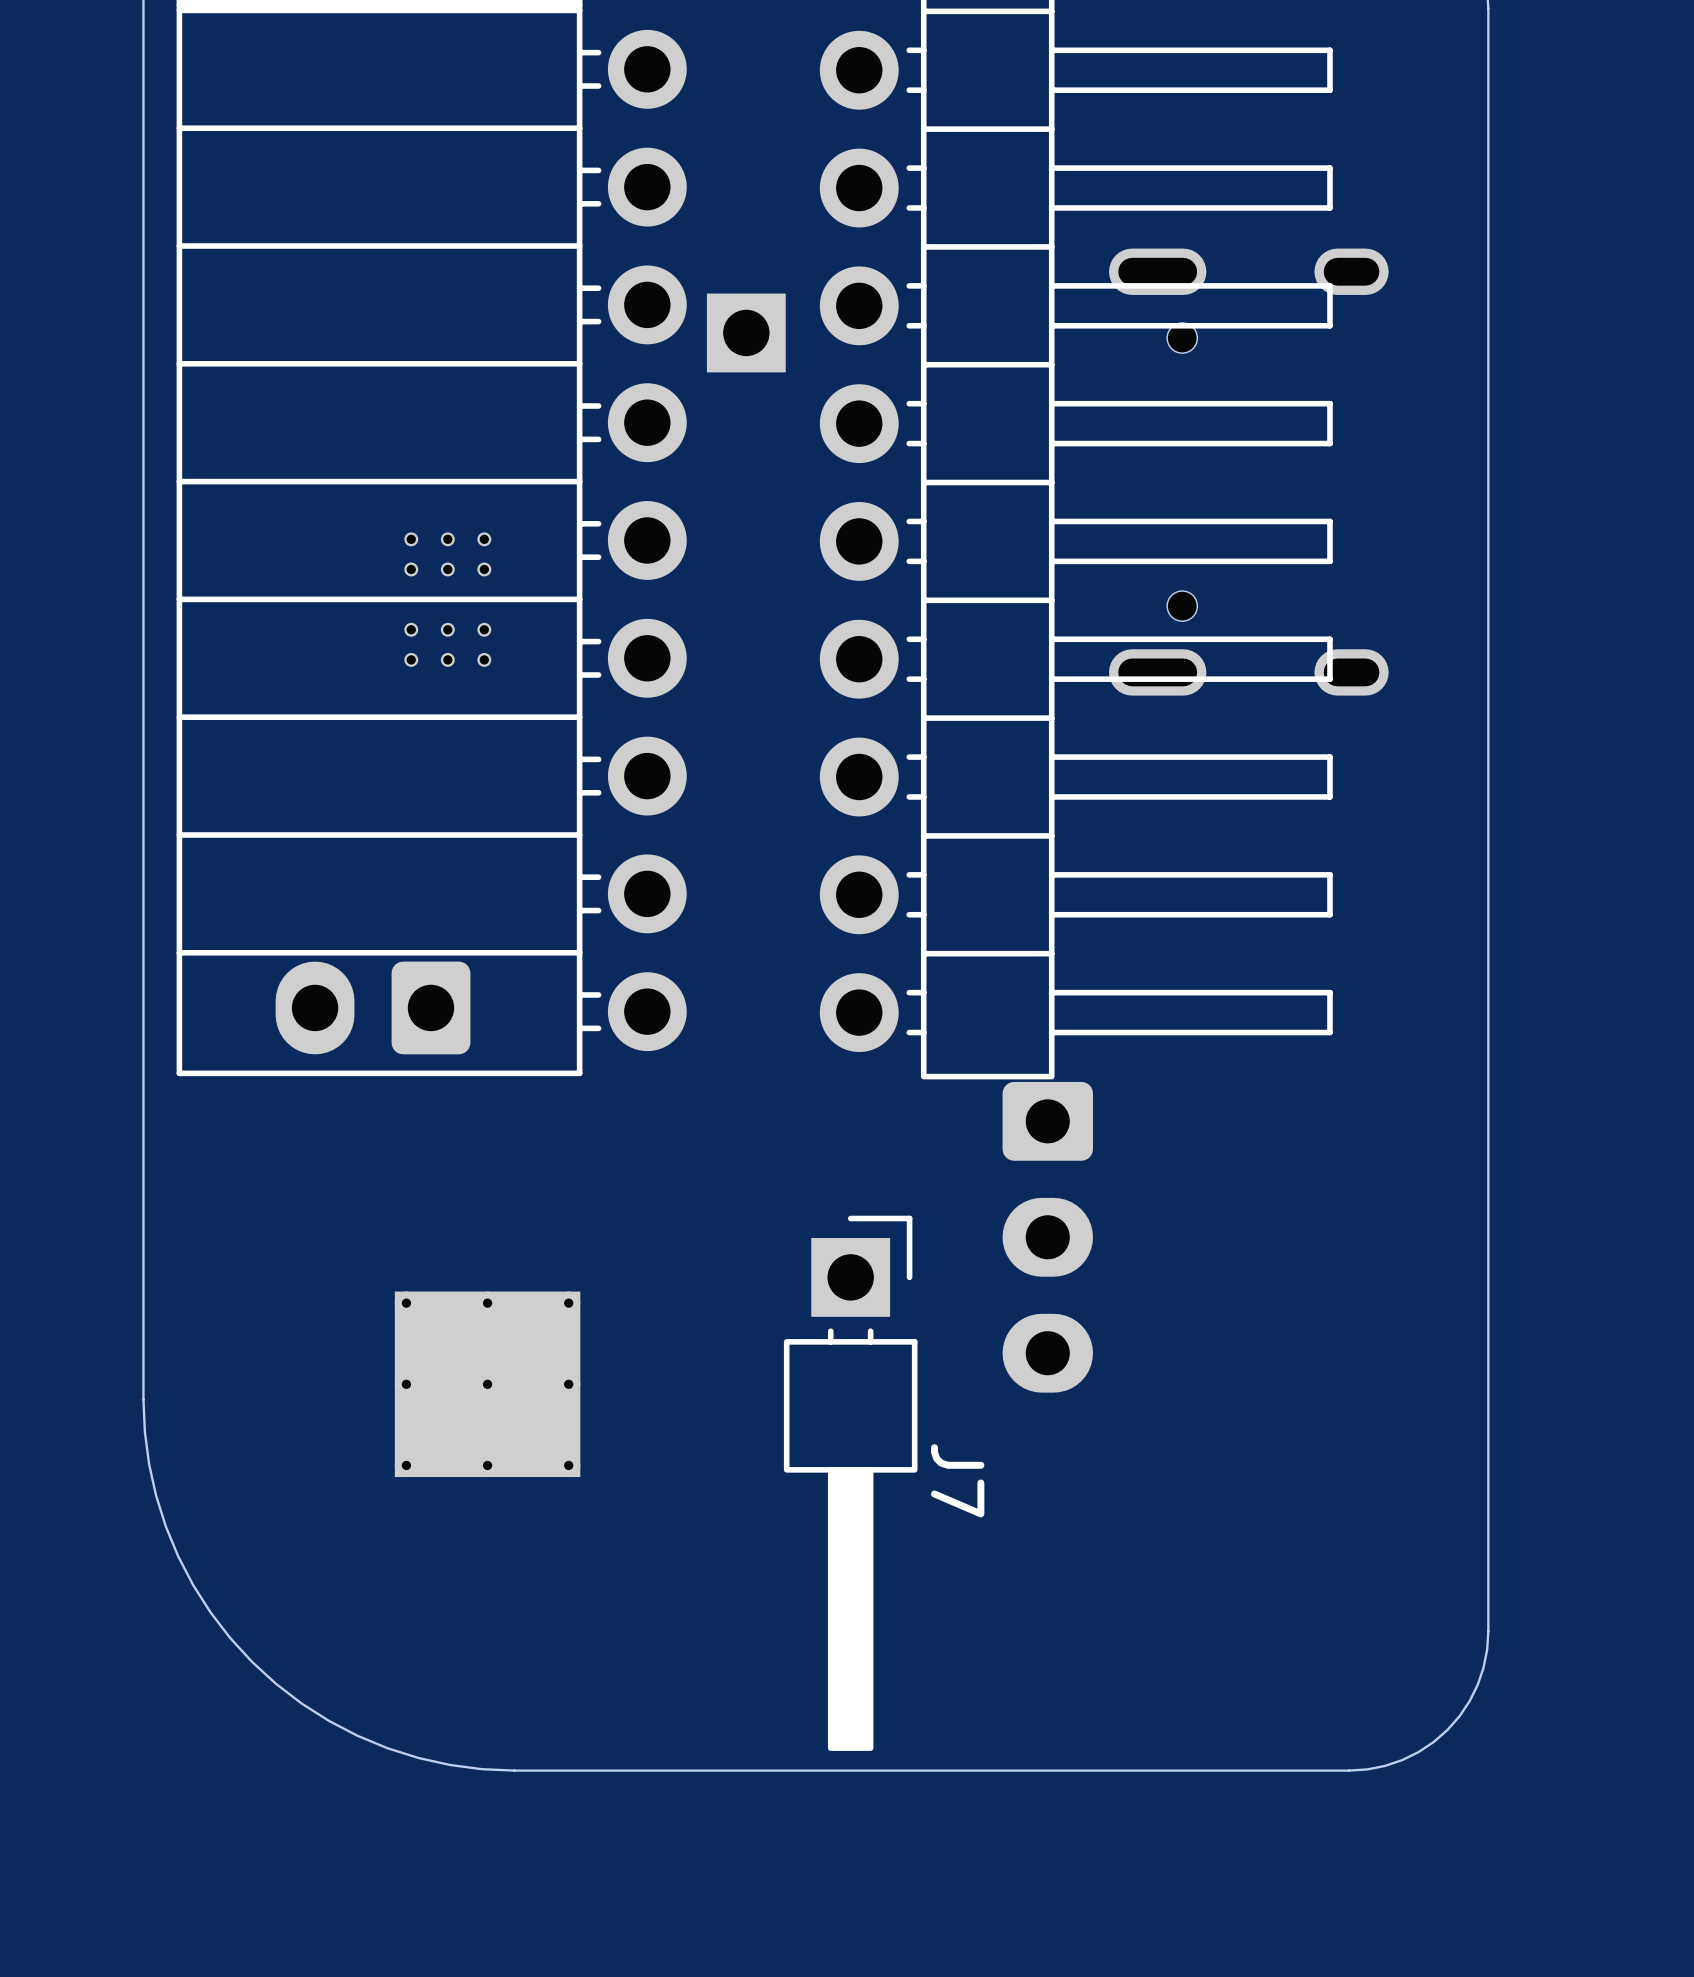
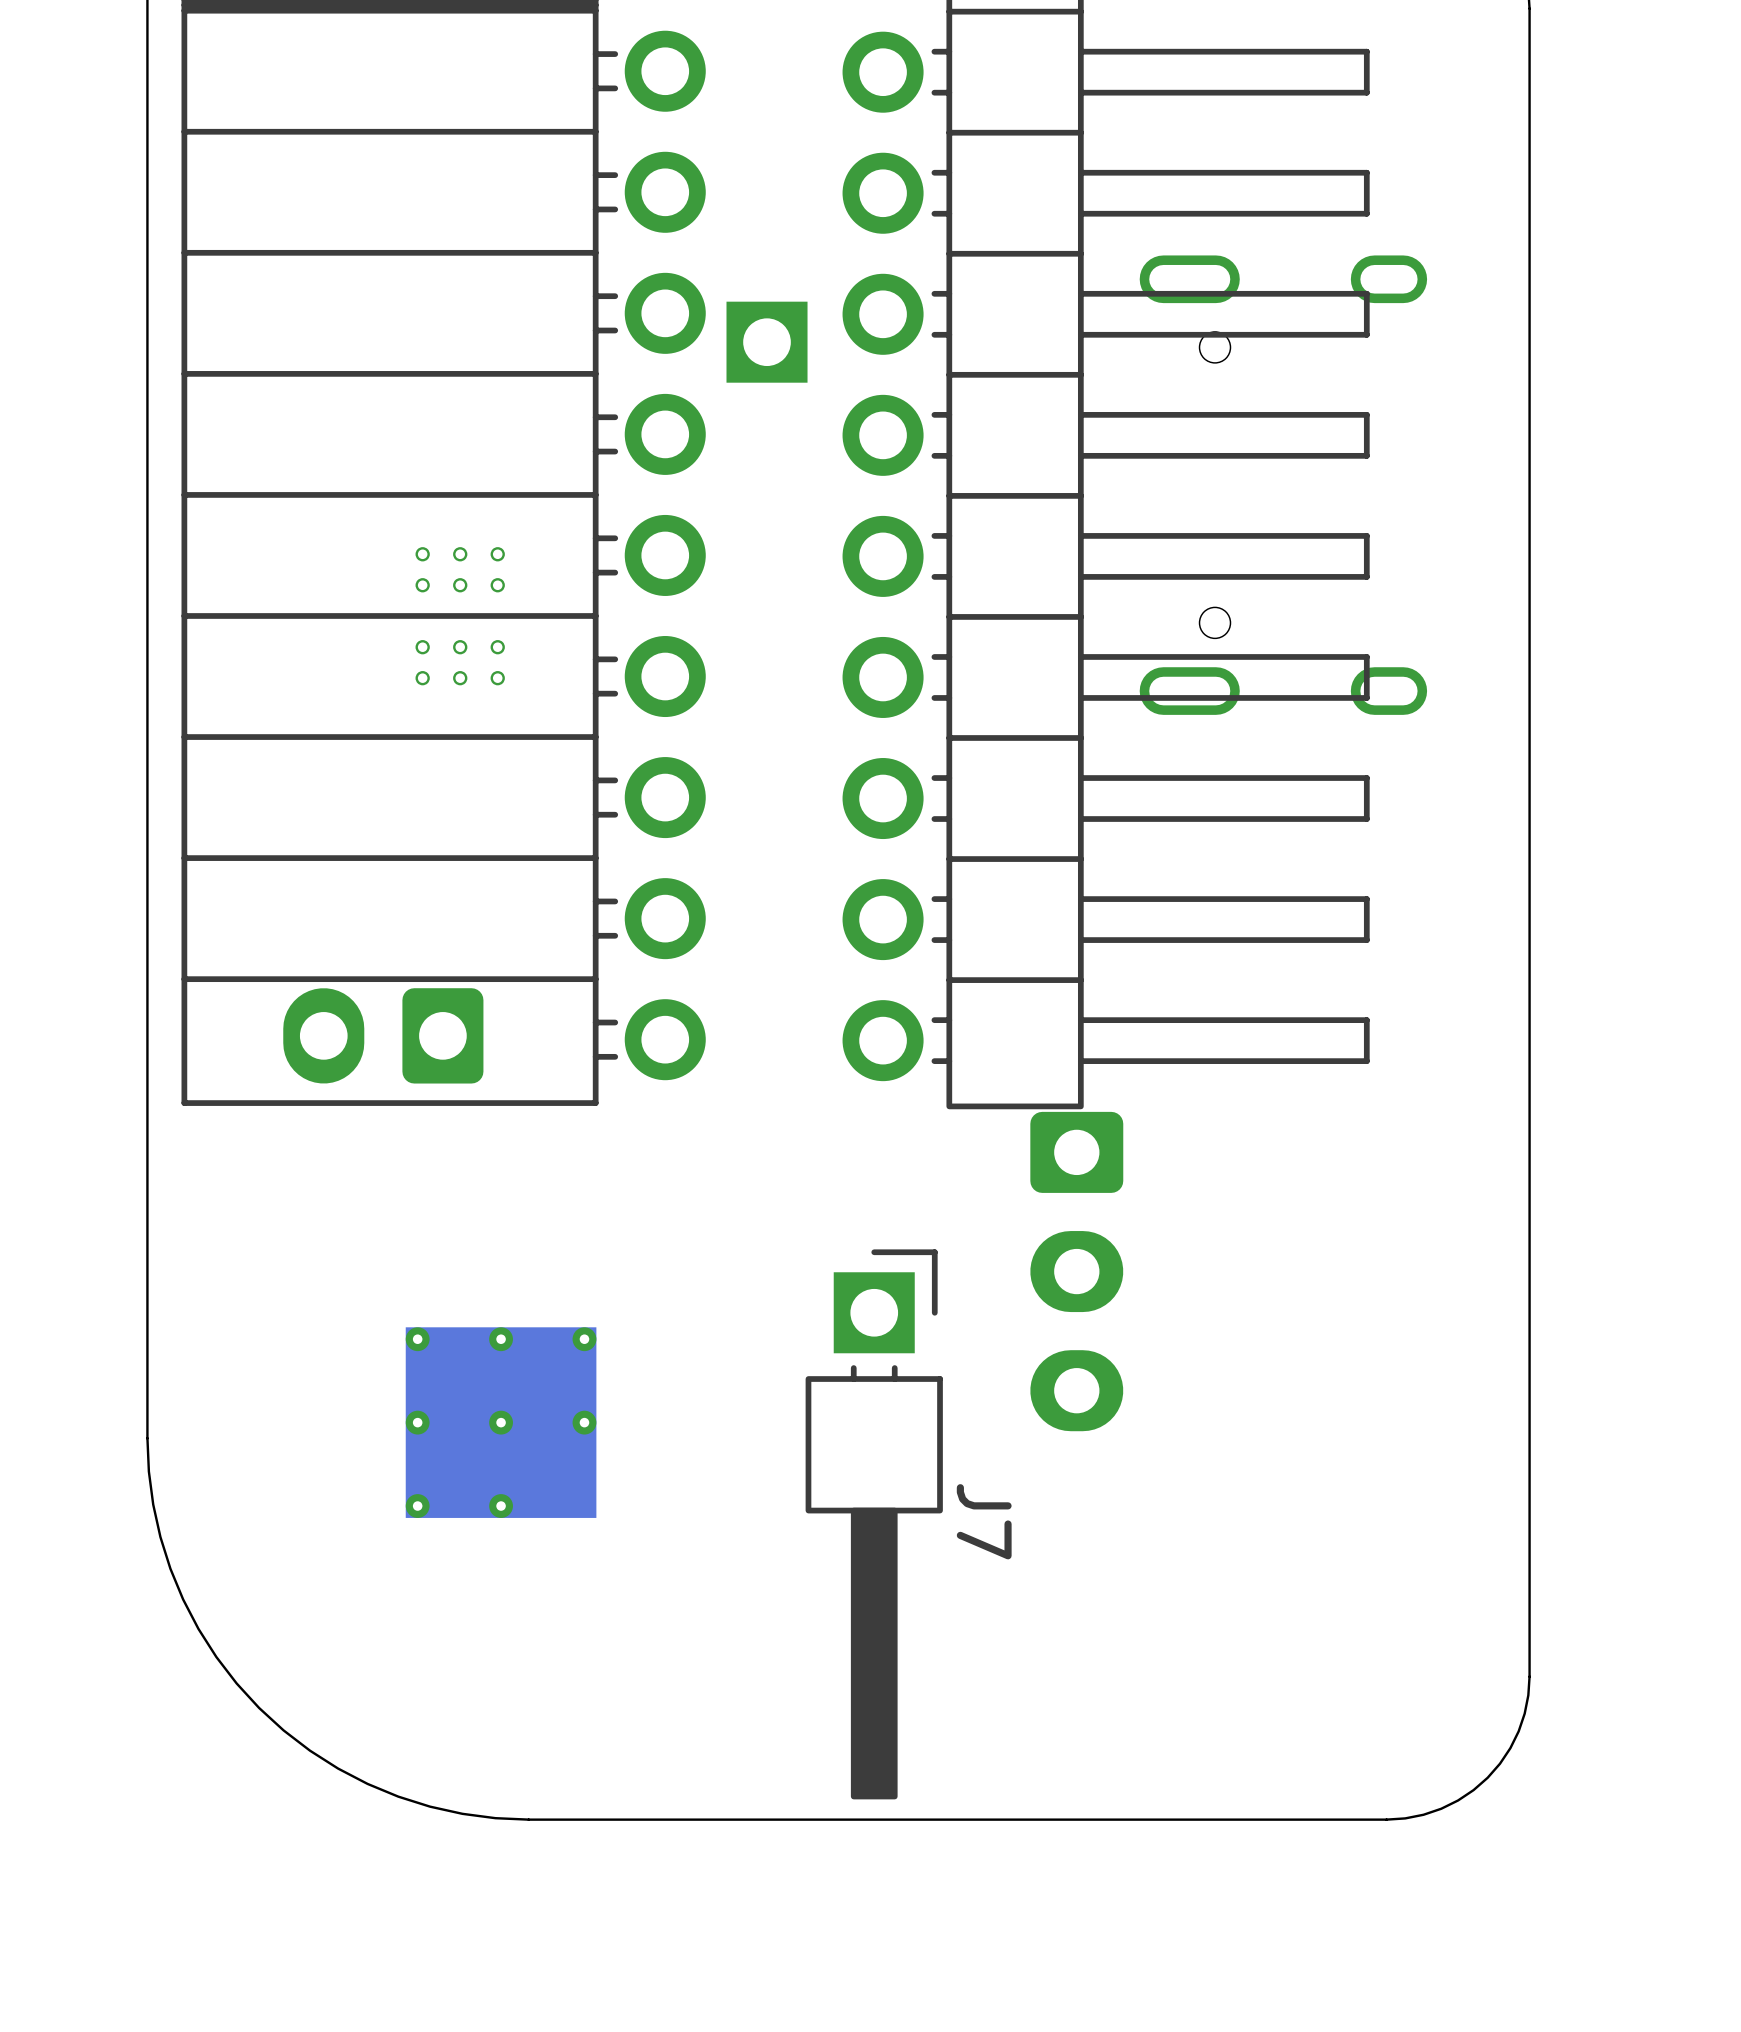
part footprint: [394, 1291, 581, 1478] -> [405, 1327, 597, 1518]

